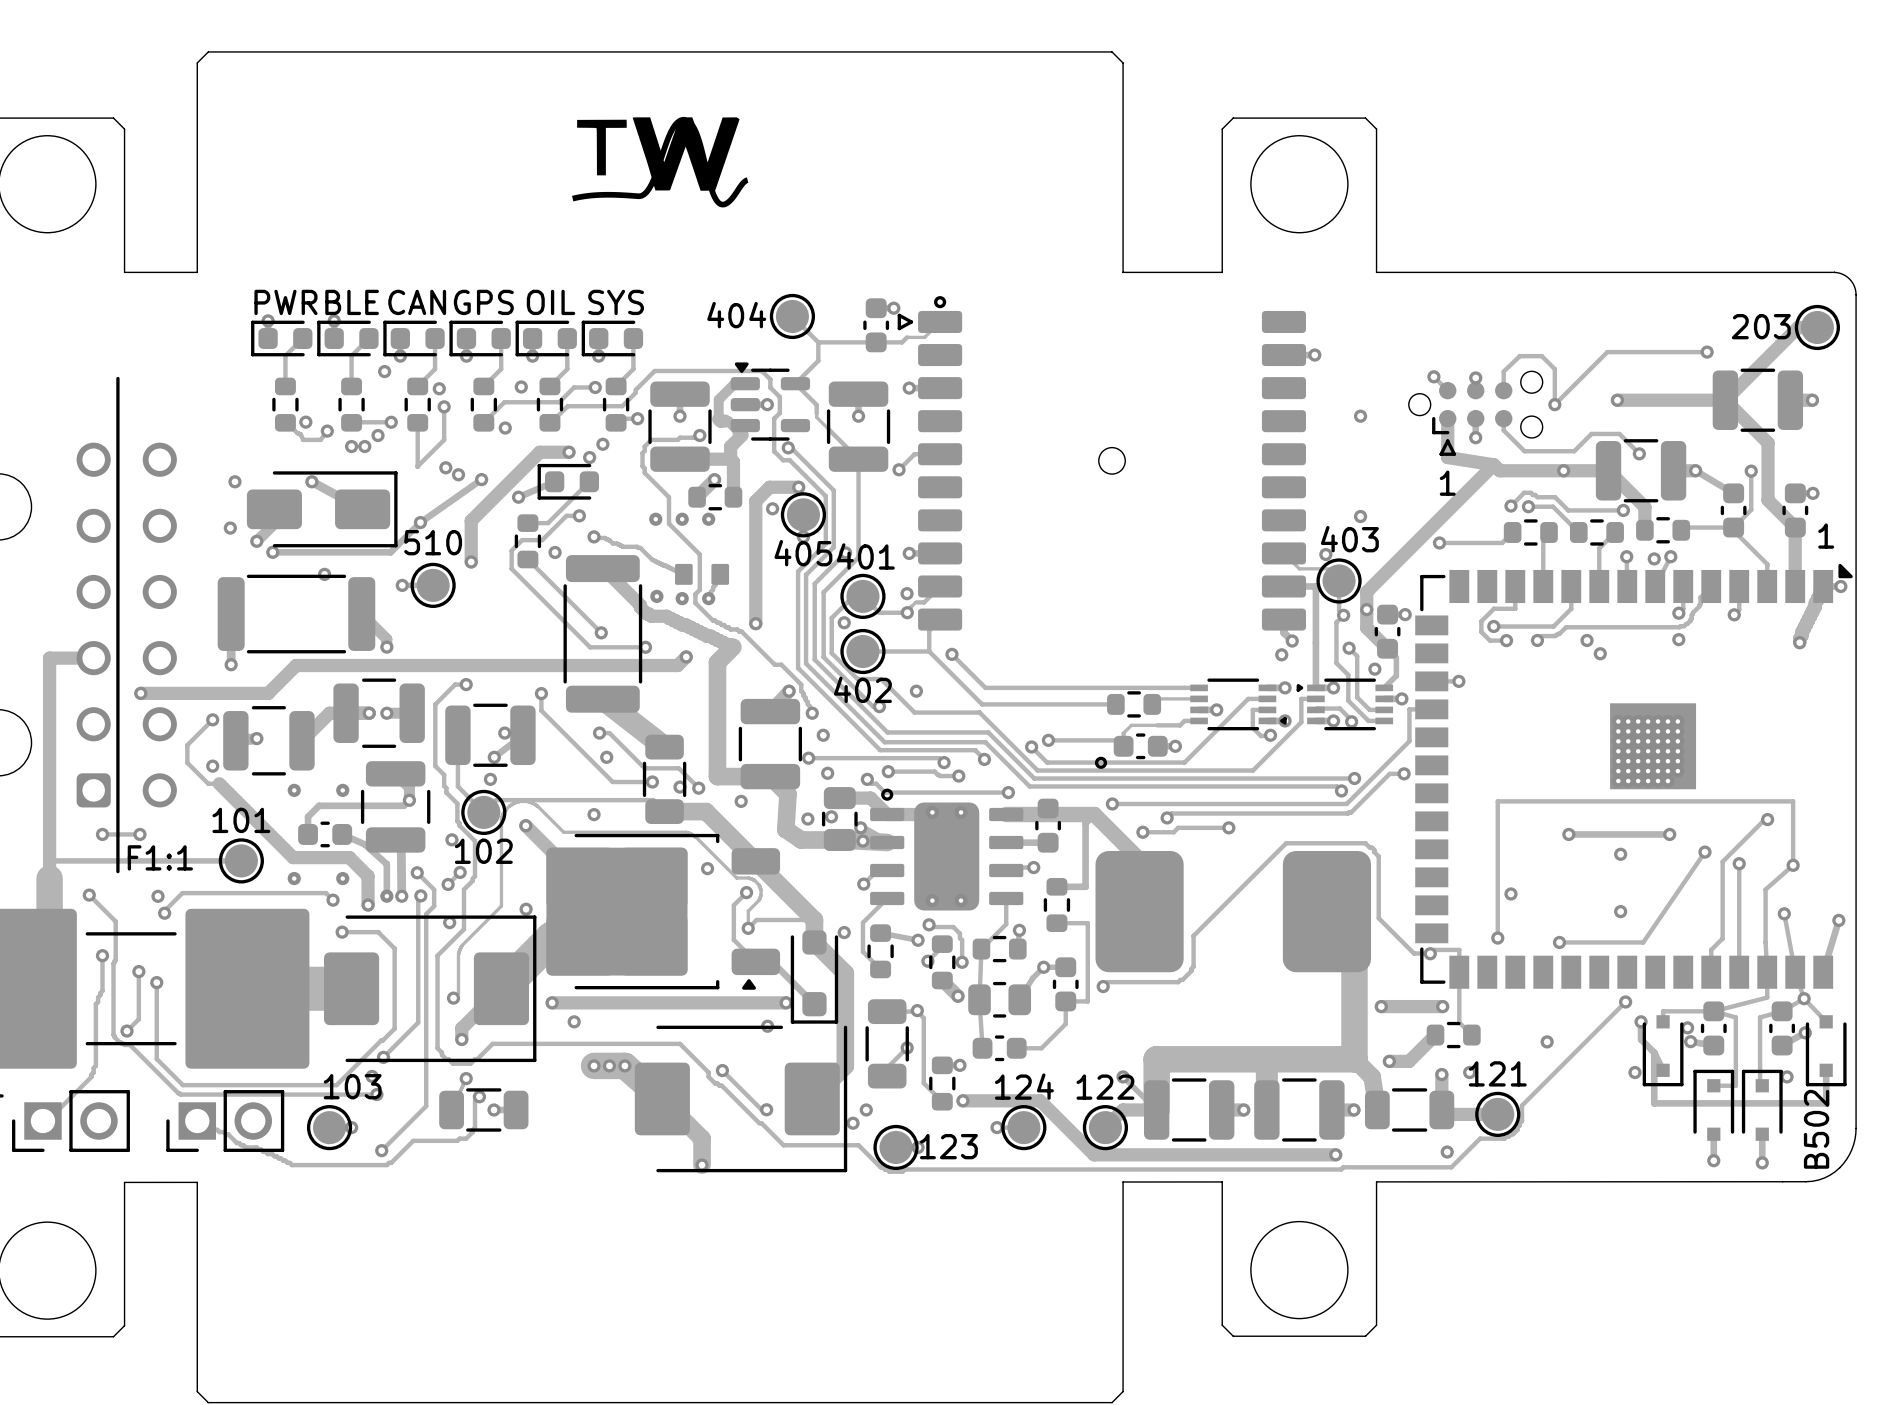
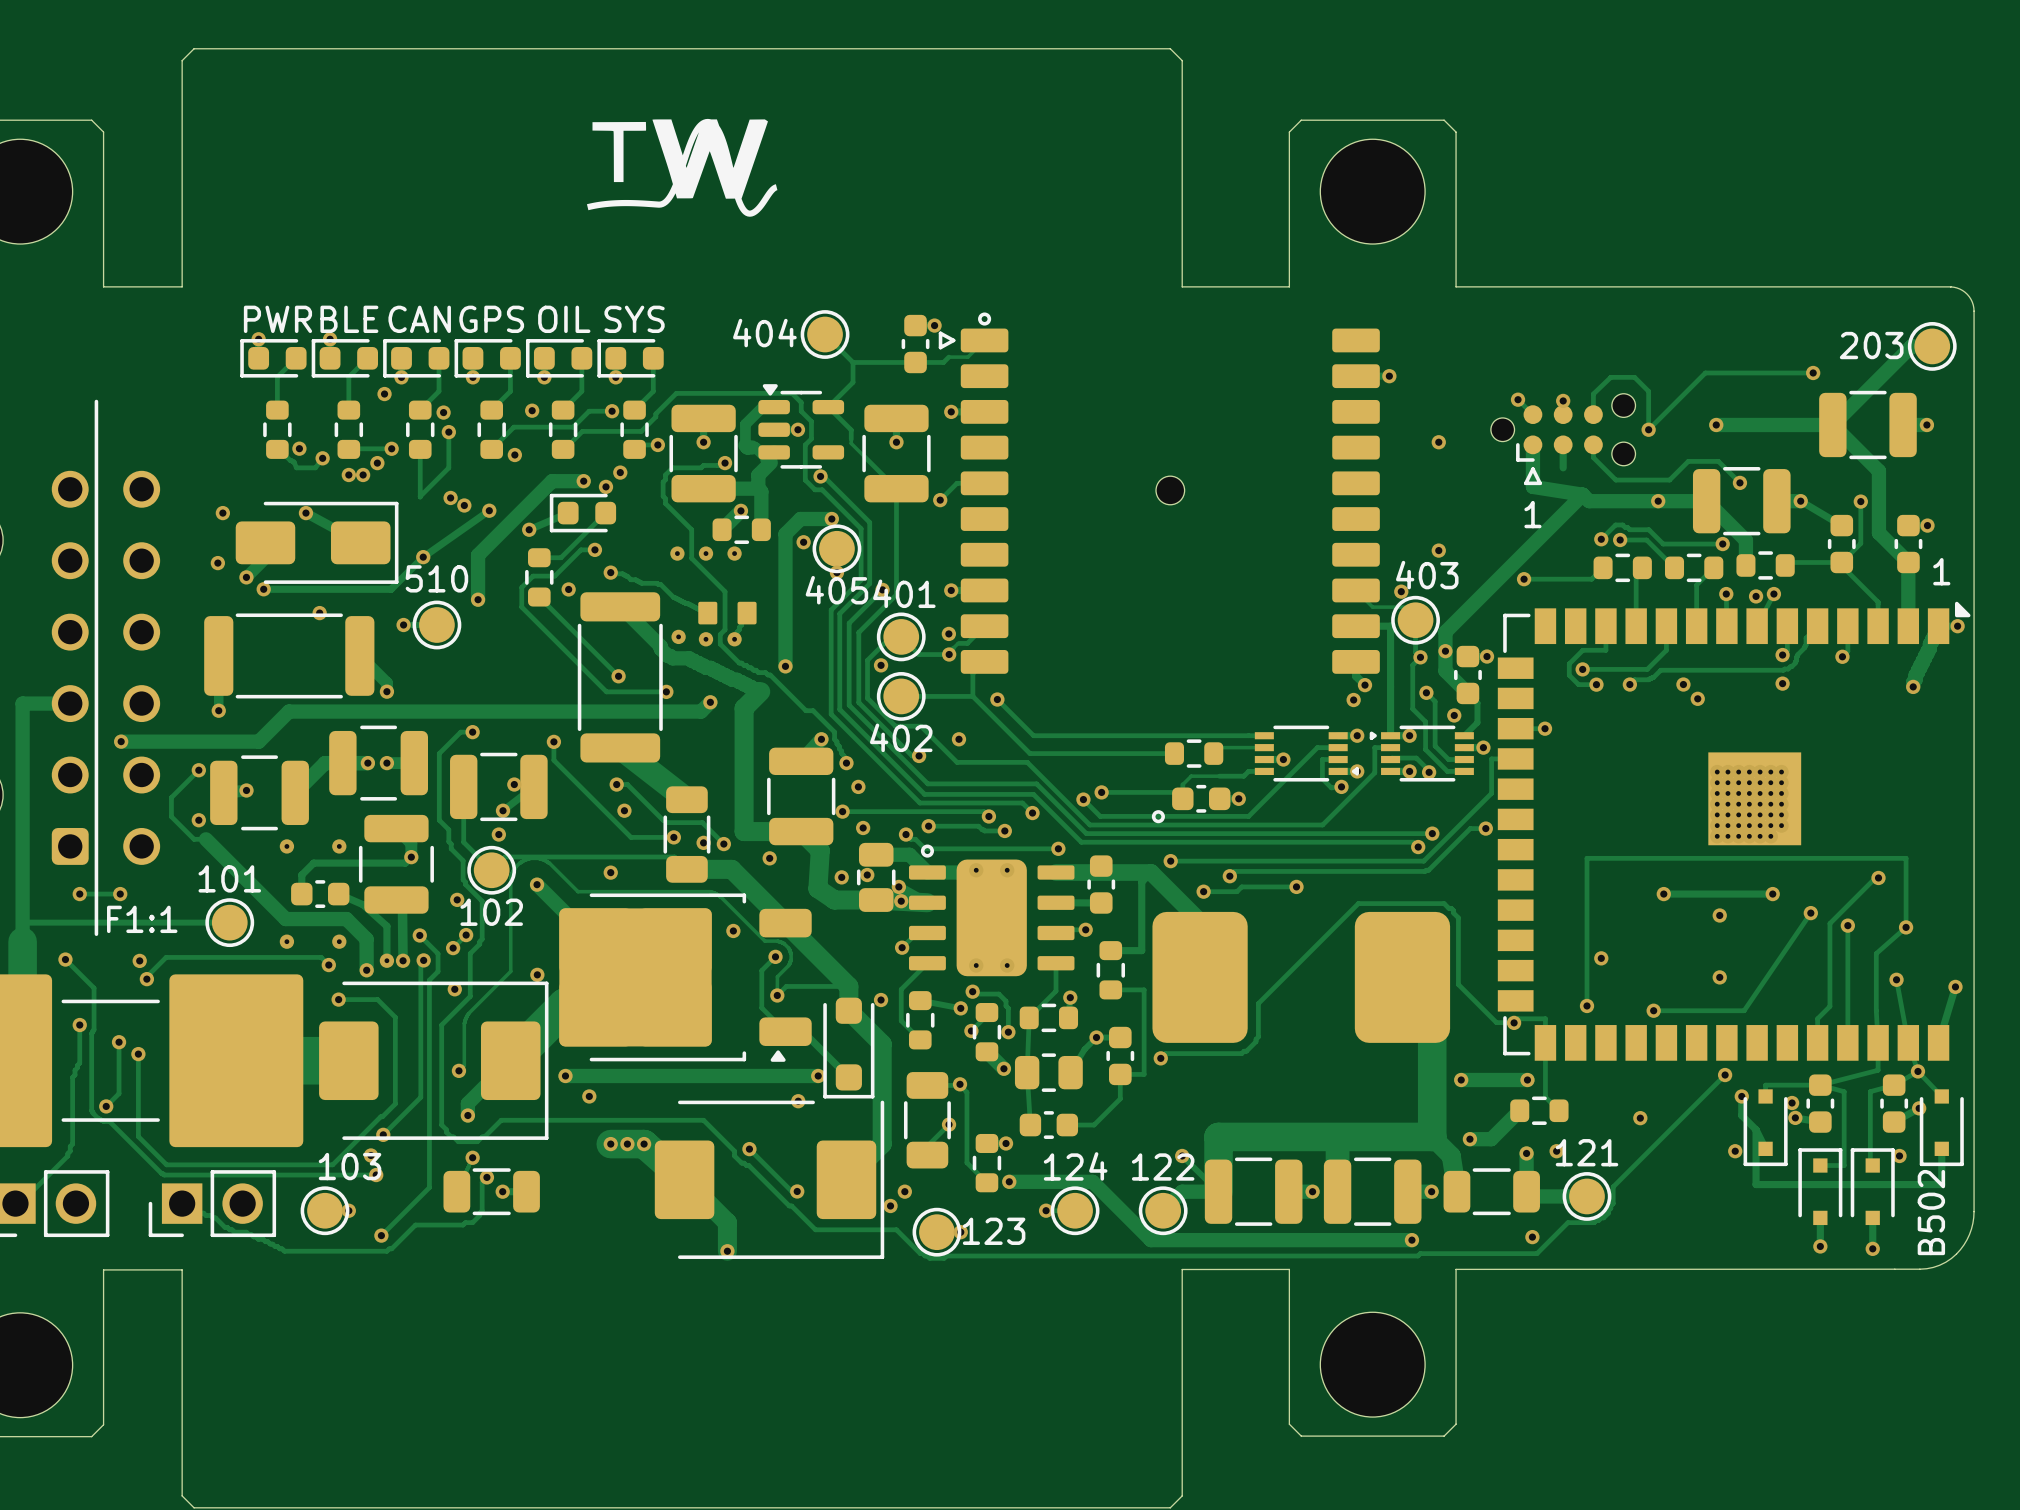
via: (1475, 437) -> none

